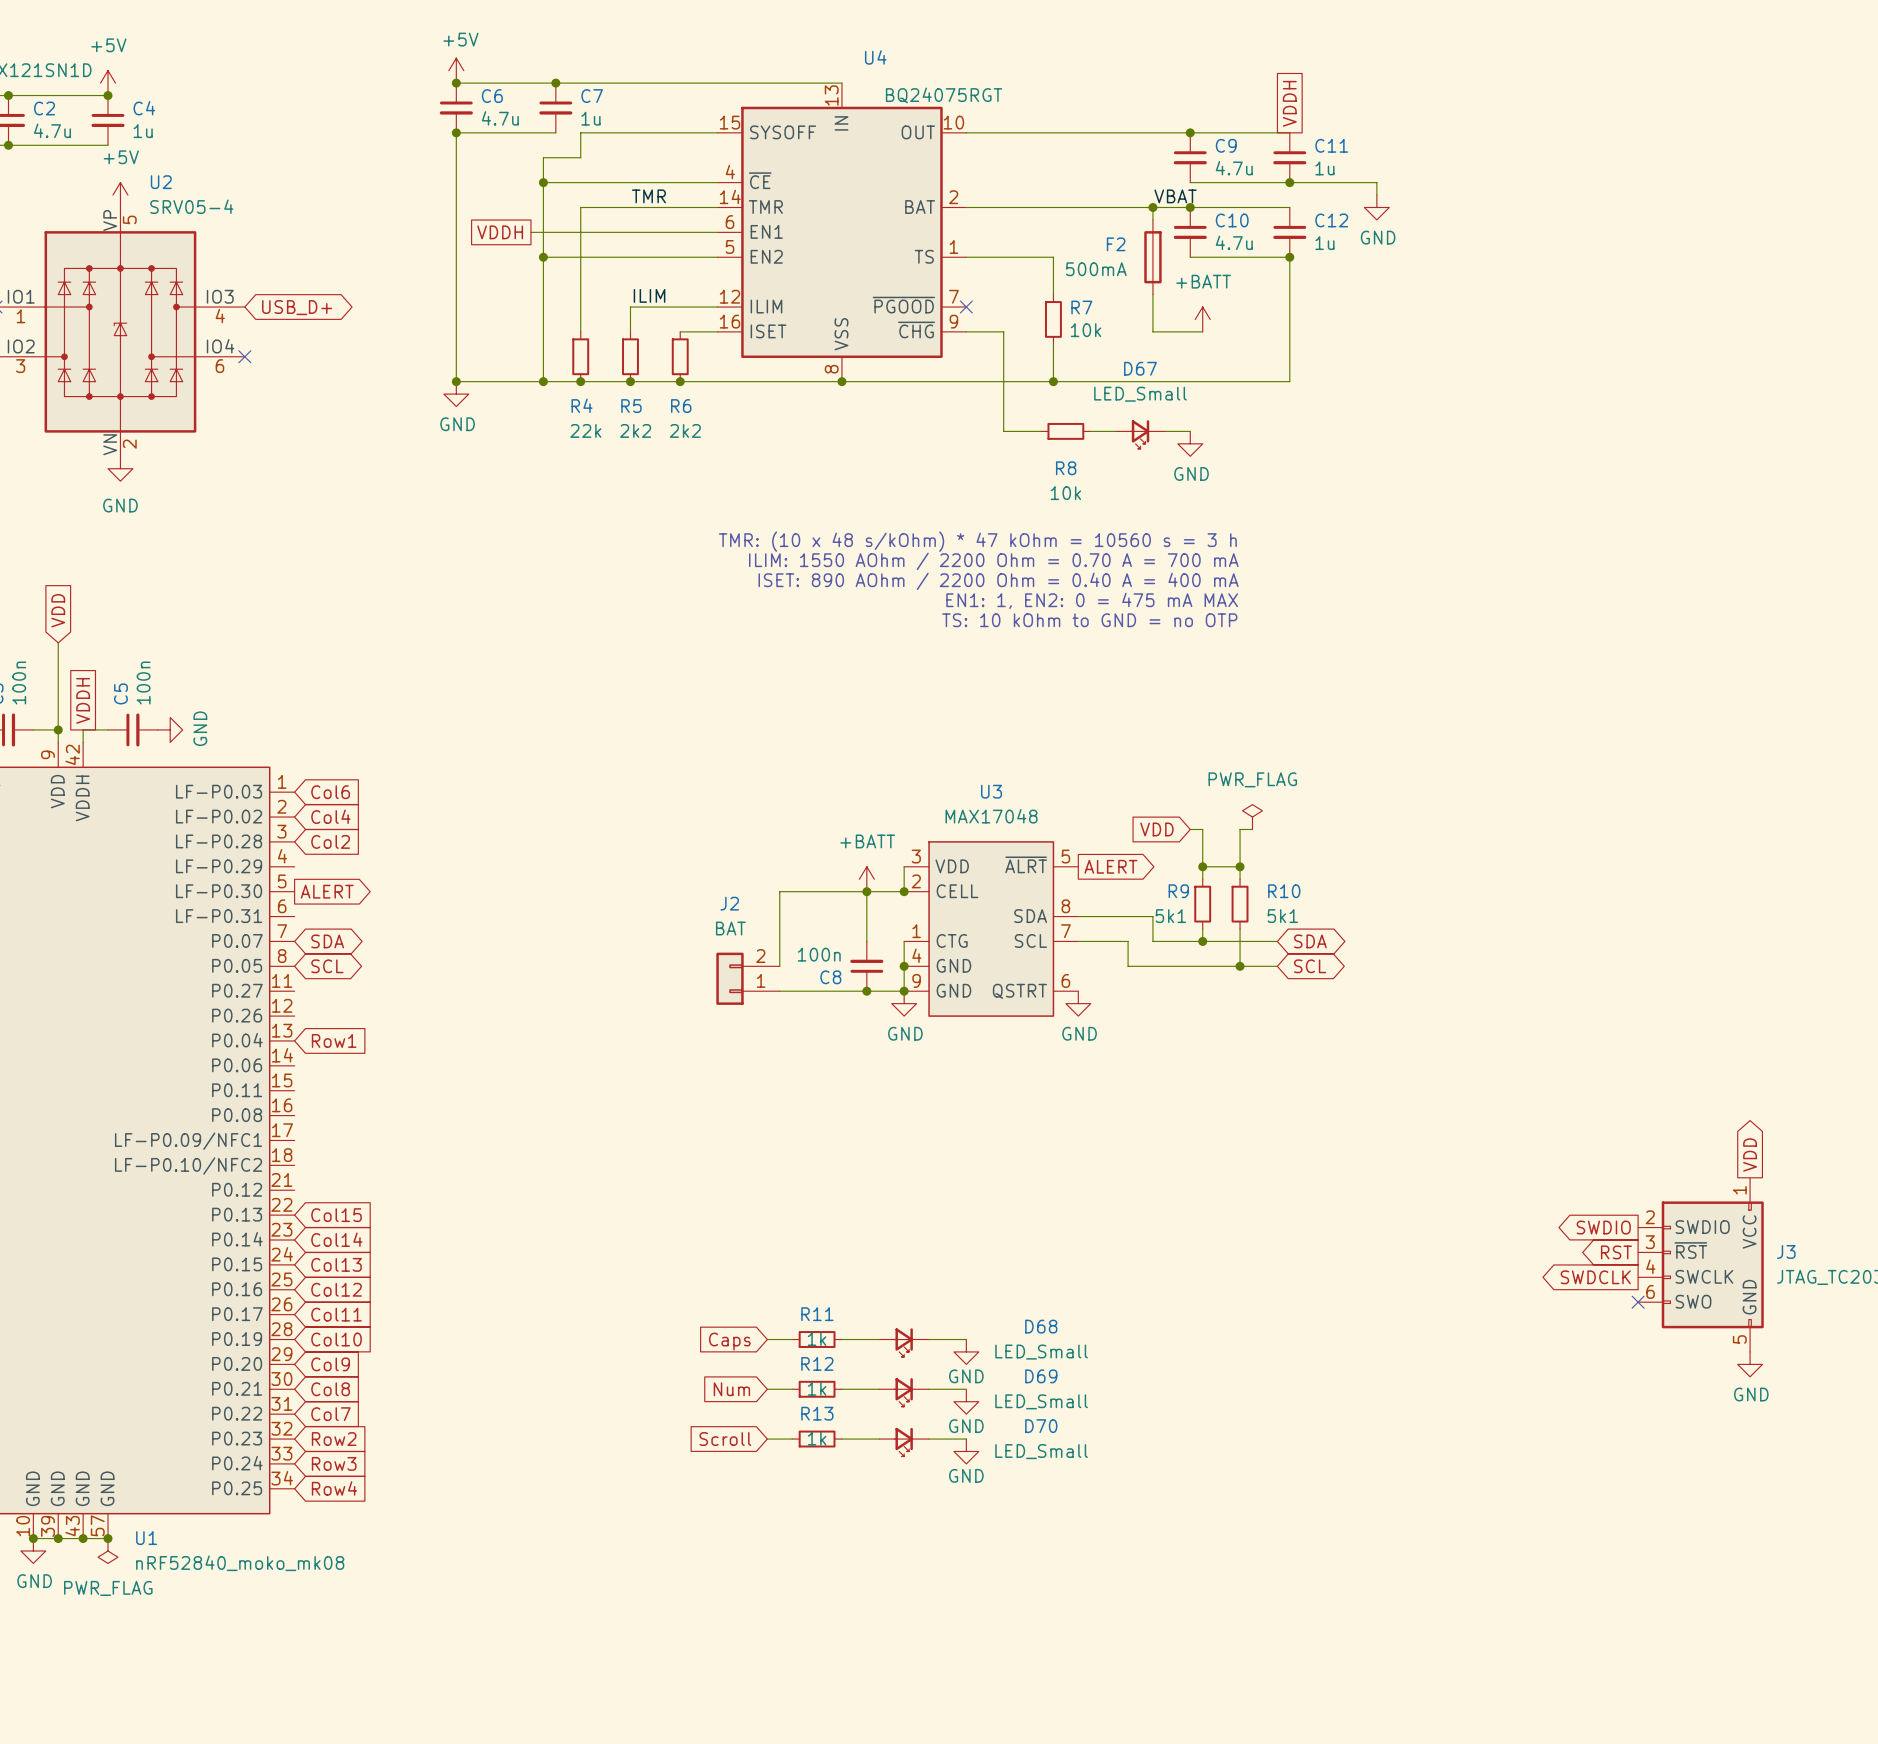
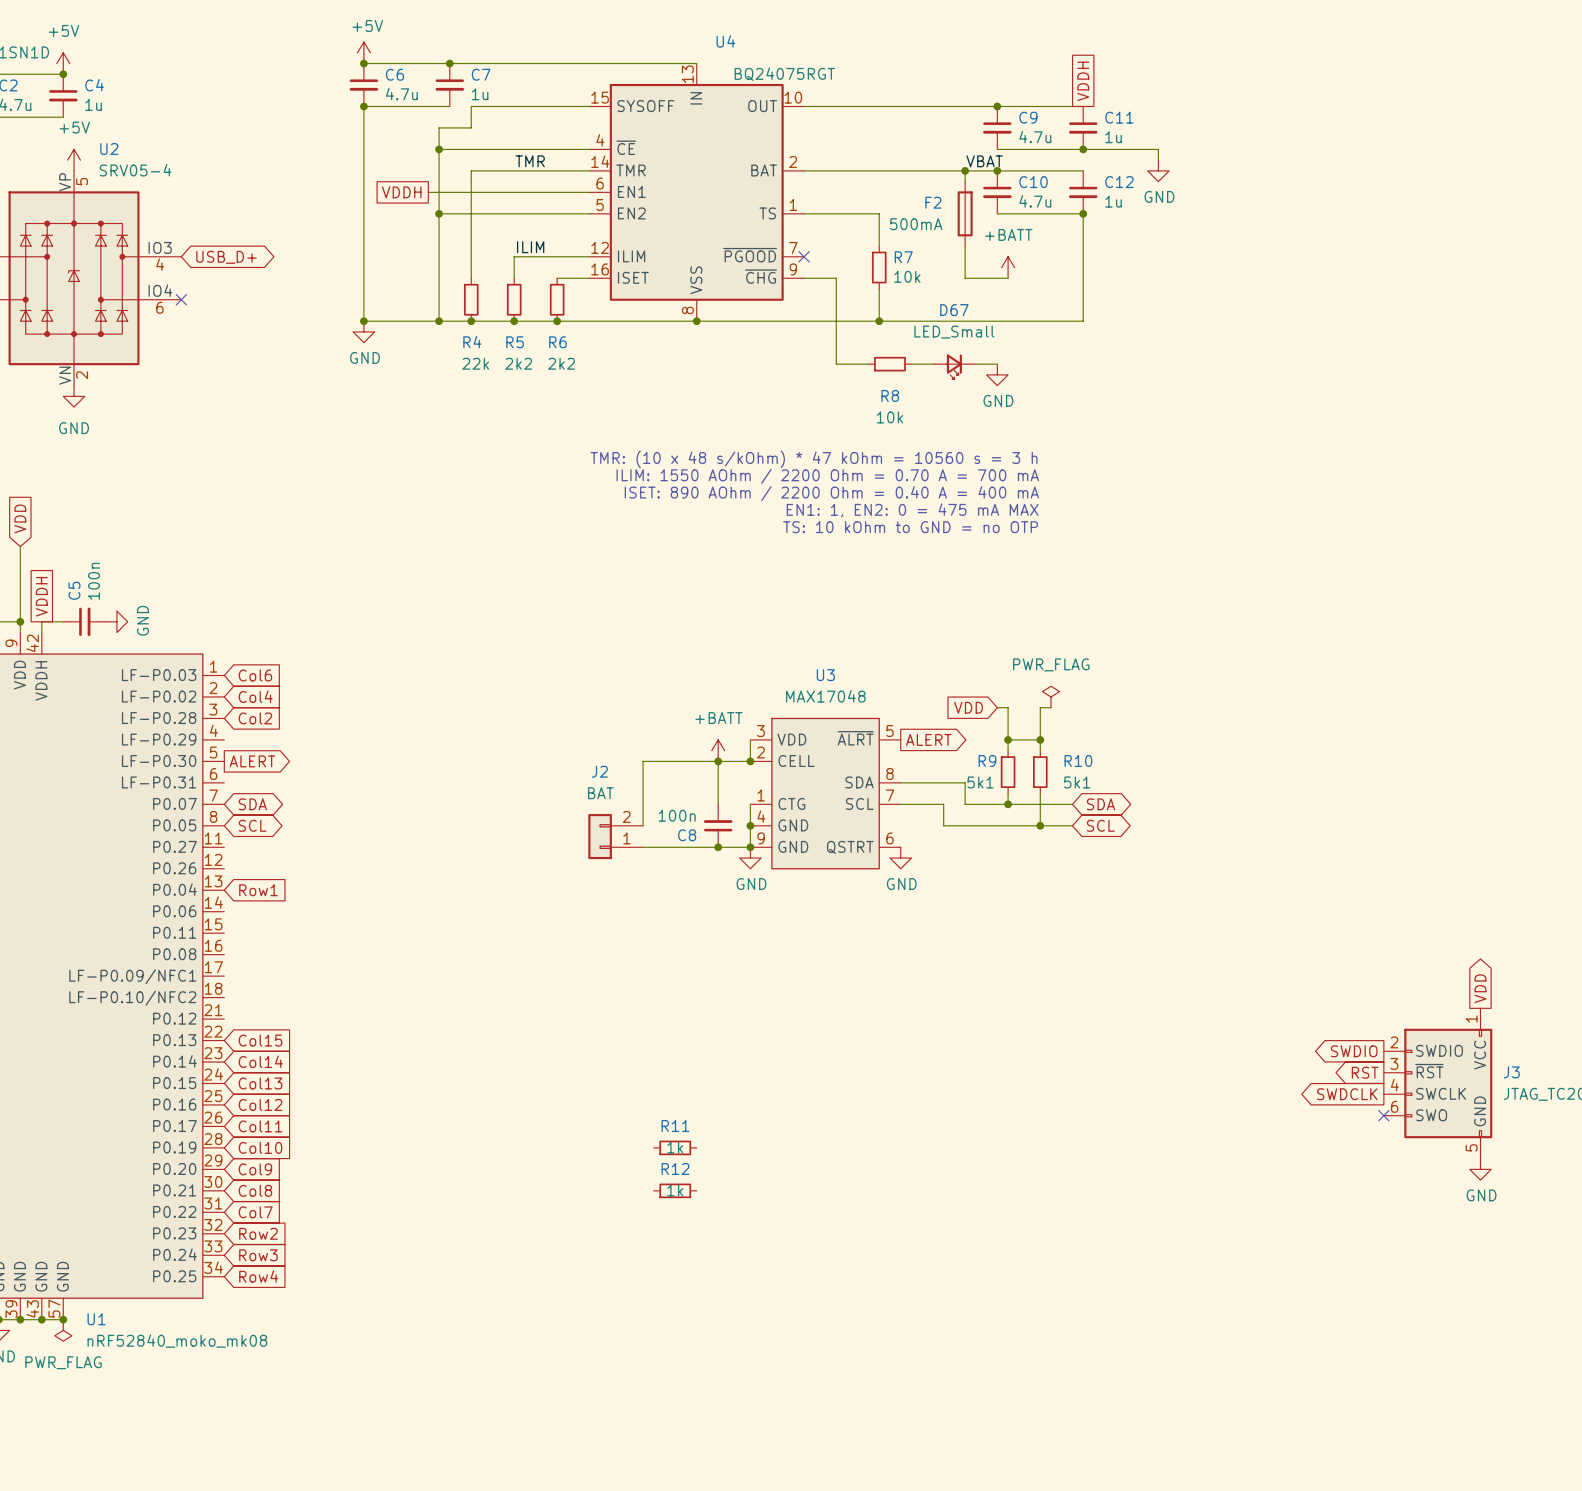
wire: (767, 1339) (792, 1339) -> none
wire: (841, 1339) (879, 1339) -> none
wire: (929, 1339) (966, 1339) -> none
global label: Caps (729, 1341) -> none
D68: LED_Small (904, 1342) -> none
power symbol: GND (966, 1351) -> none
global label: Num (731, 1389) -> none
wire: (767, 1389) (792, 1389) -> none
wire: (841, 1389) (879, 1389) -> none
wire: (929, 1389) (966, 1389) -> none
D69: LED_Small (904, 1392) -> none
power symbol: GND (966, 1401) -> none
global label: Scroll (725, 1439) -> none
wire: (767, 1439) (792, 1439) -> none
R13: 1k (817, 1439) -> none
wire: (841, 1439) (879, 1439) -> none
wire: (929, 1439) (966, 1439) -> none
D70: LED_Small (904, 1442) -> none
power symbol: GND (966, 1451) -> none

